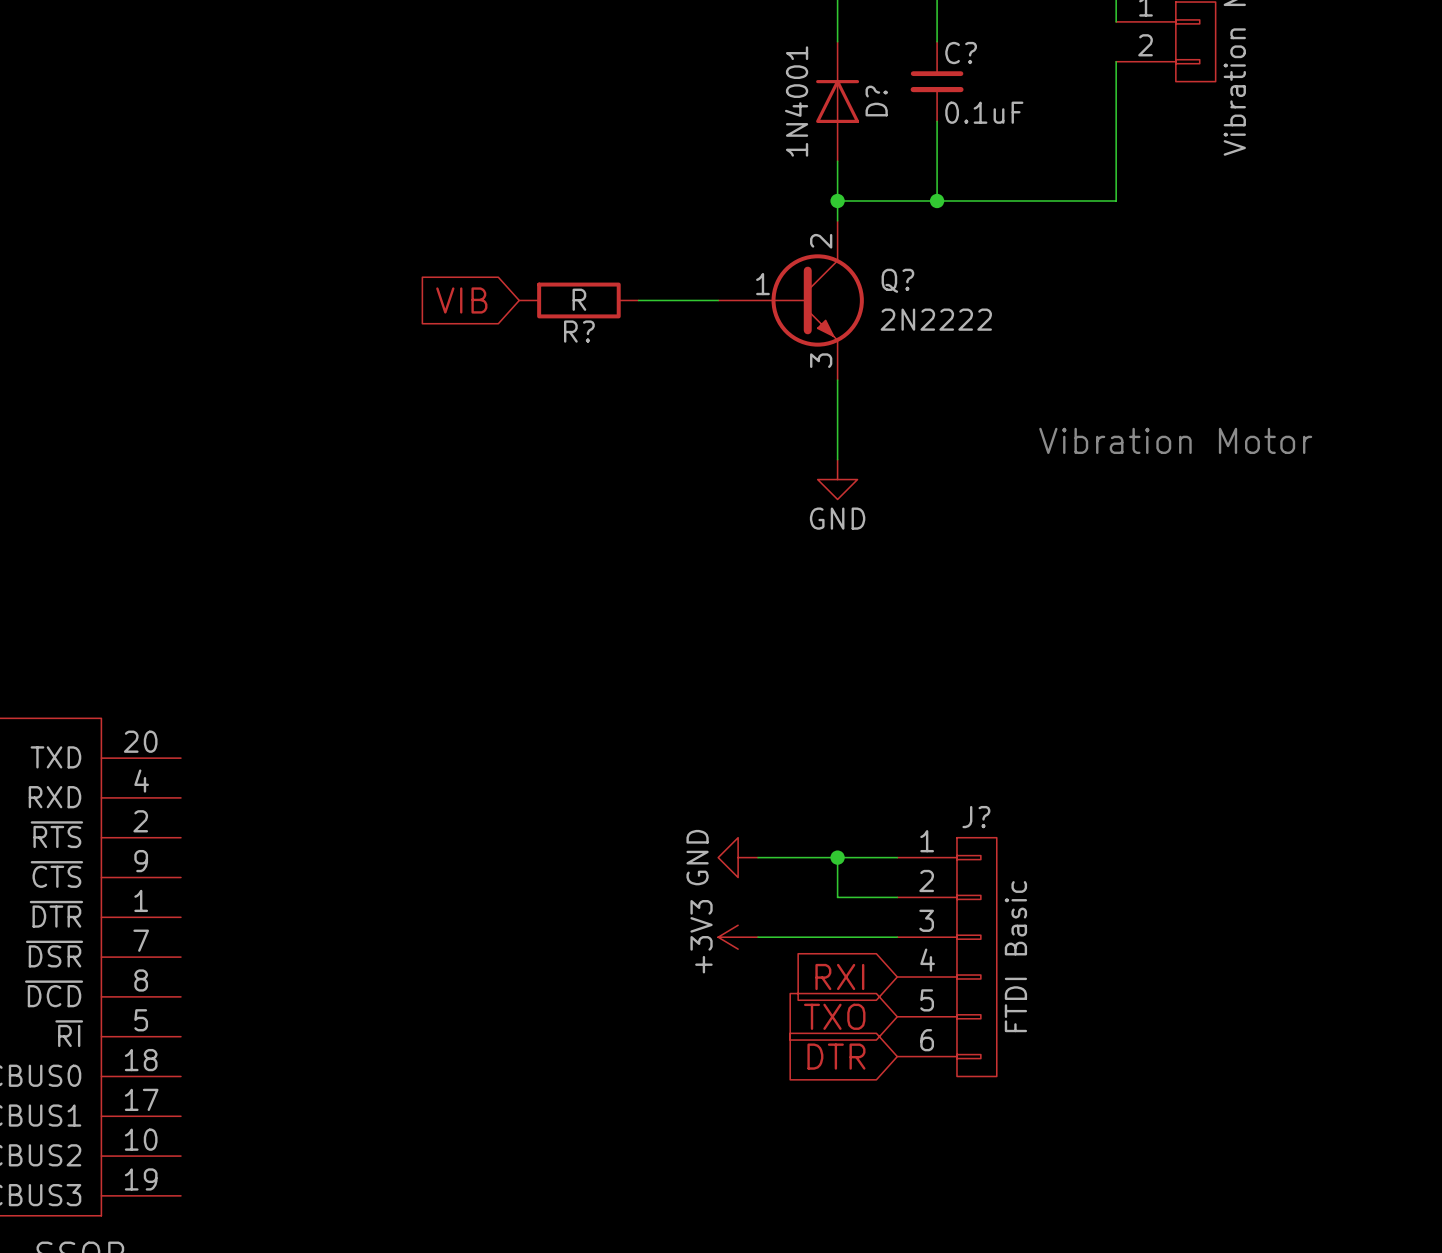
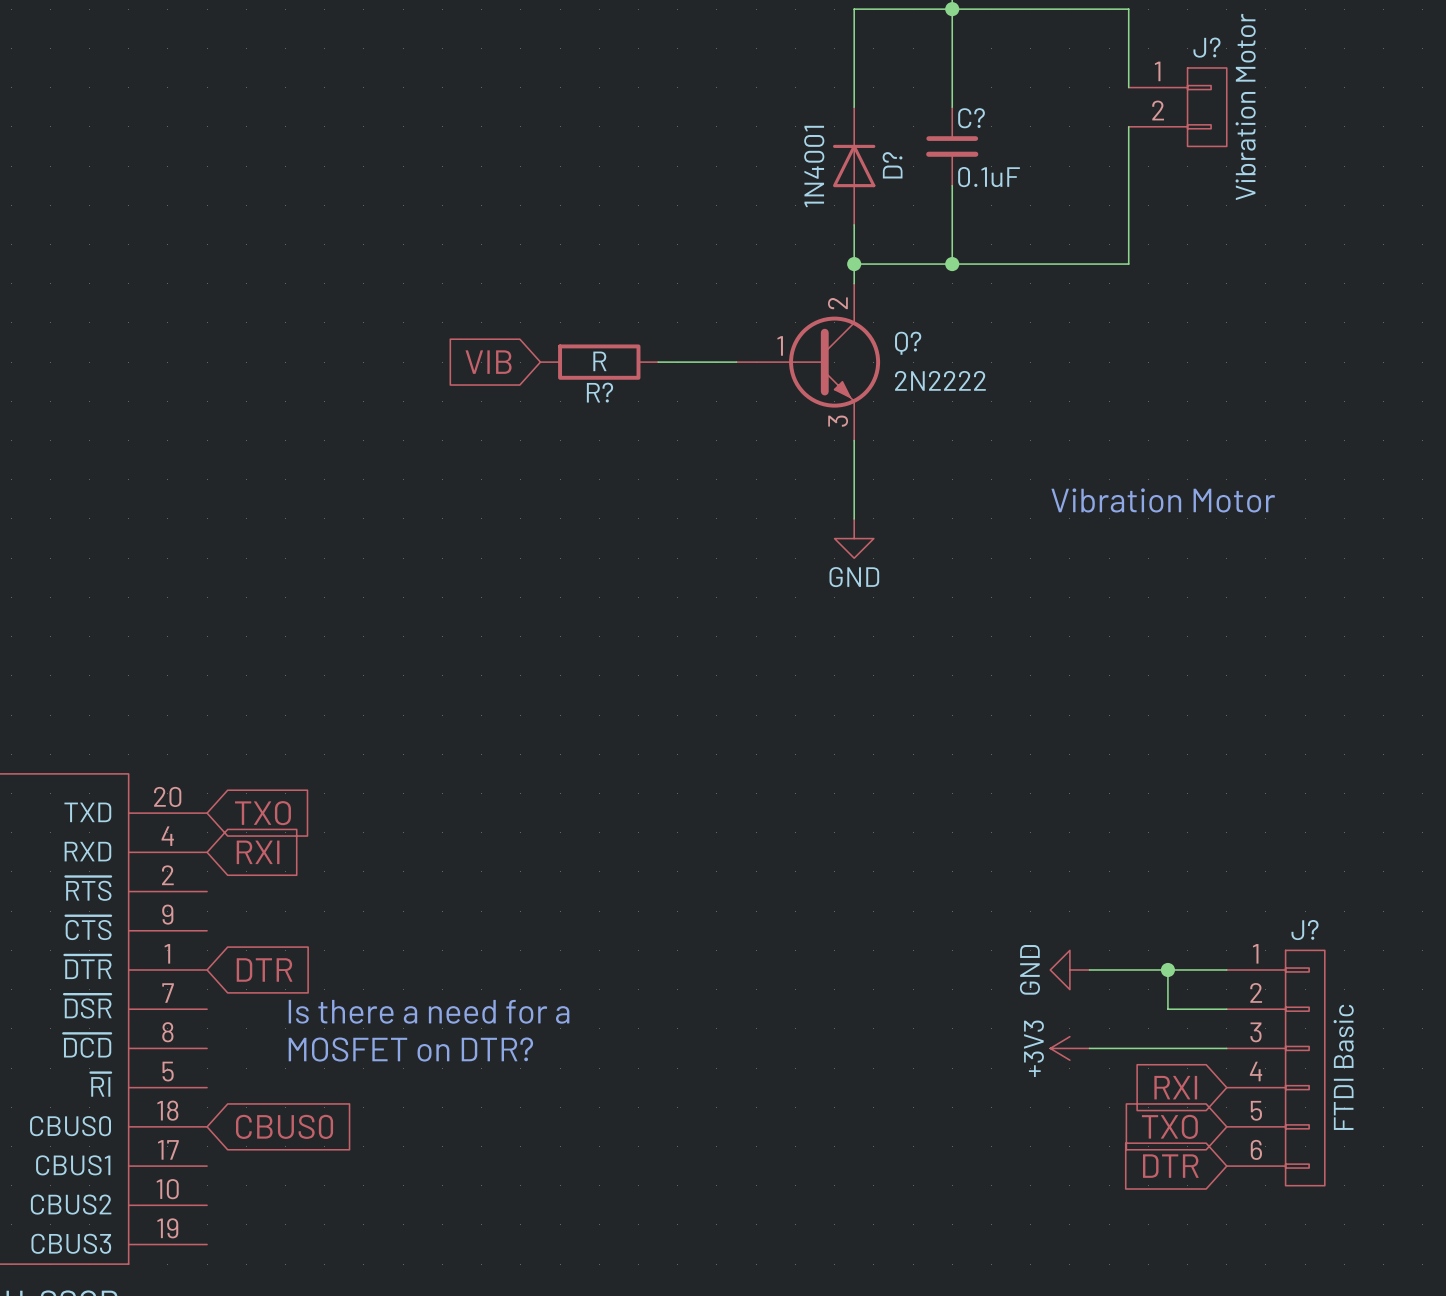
global label: none -> TXO (262, 813)
global label: none -> RXI (258, 852)
power symbol position: GND (738, 857) -> GND (1069, 969)
wire: (758, 857) (897, 857) -> (1089, 969) (1226, 969)
wire: (837, 857) (837, 897) (897, 897) -> (1167, 969) (1167, 1009) (1226, 1009)
junction: (837, 857) -> none
global label: none -> DTR (264, 969)
junction: none -> (1167, 969)
power symbol position: +3V3 (738, 937) -> +3V3 (1069, 1048)
wire: (758, 937) (897, 937) -> (1089, 1048) (1226, 1048)
J? position: (947, 957) -> (1275, 1068)
text: none -> Is there a need for a (429, 1011)
global label position: RXI (839, 977) -> RXI (1175, 1087)
text: none -> MOSFET on DTR? (410, 1049)
global label position: TXO (834, 1016) -> TXO (1169, 1126)
global label position: DTR (836, 1056) -> DTR (1170, 1166)
global label: none -> CBUS0 (284, 1126)

